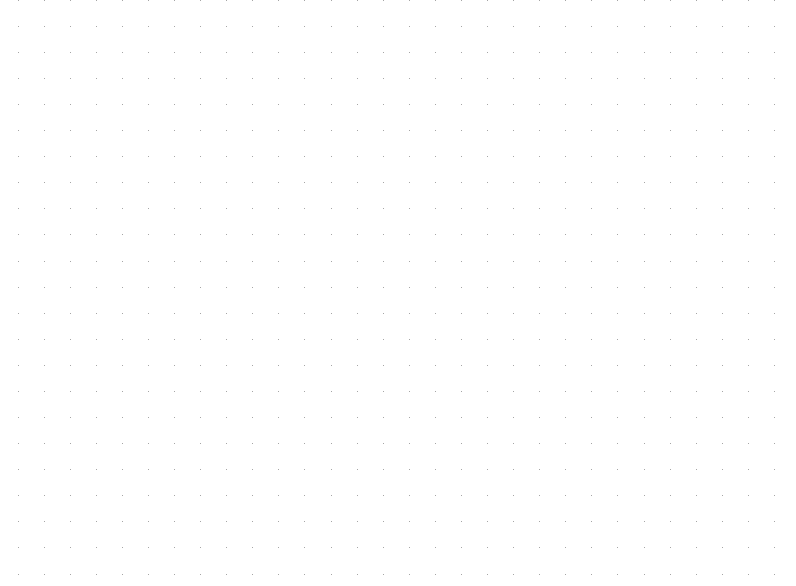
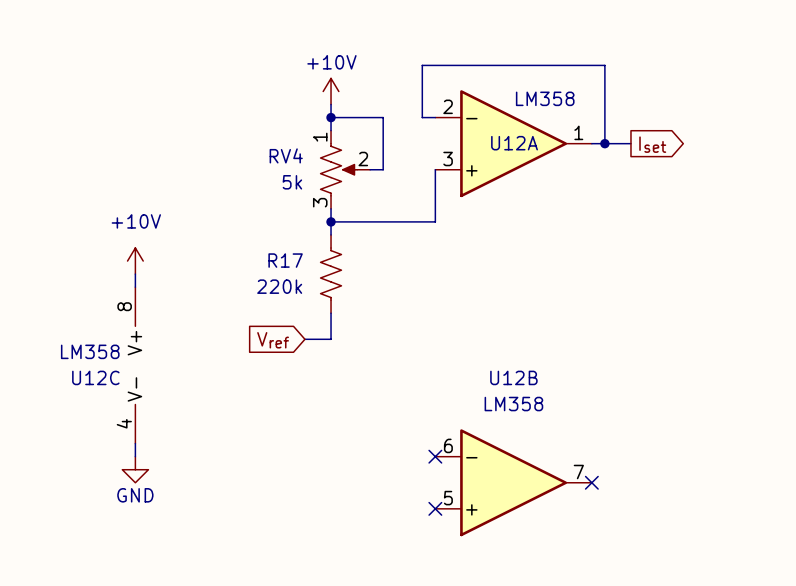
power symbol: none -> +10V (331, 91)
wire: none -> (331, 104) (331, 130)
wire: none -> (331, 117) (383, 117) (383, 169) (370, 169)
junction: none -> (331, 117)
wire: none -> (435, 117) (422, 117) (422, 65) (604, 65) (604, 143)
U12A: none -> LM358 (513, 143)
wire: none -> (591, 143) (630, 143)
junction: none -> (604, 143)
global label: none -> Iset (652, 144)
RV4: none -> 5k (345, 169)
wire: none -> (435, 169) (435, 221) (331, 221)
wire: none -> (331, 208) (331, 234)
junction: none -> (331, 221)
power symbol: none -> +10V (135, 261)
wire: none -> (135, 274) (135, 287)
R17: none -> 220k (331, 274)
wire: none -> (331, 313) (331, 339) (304, 339)
global label: none -> Vref (273, 340)
U12C: none -> LM358 (135, 365)
wire: none -> (135, 443) (135, 456)
no-connect mark: none -> (435, 456)
power symbol: none -> GND (135, 469)
U12B: none -> LM358 (513, 482)
no-connect mark: none -> (591, 482)
no-connect mark: none -> (435, 508)

